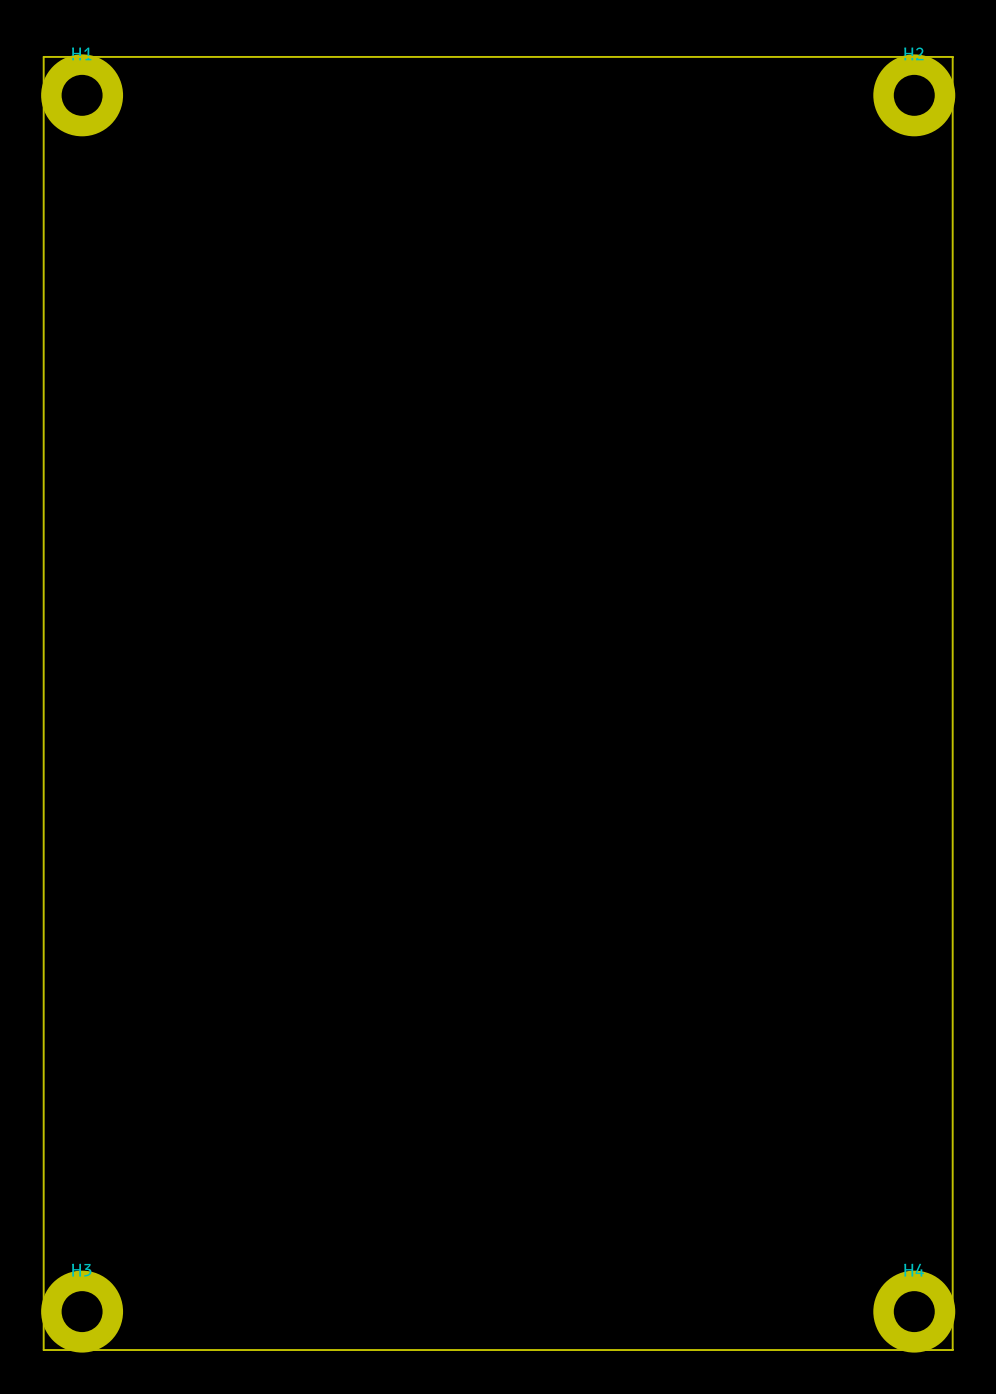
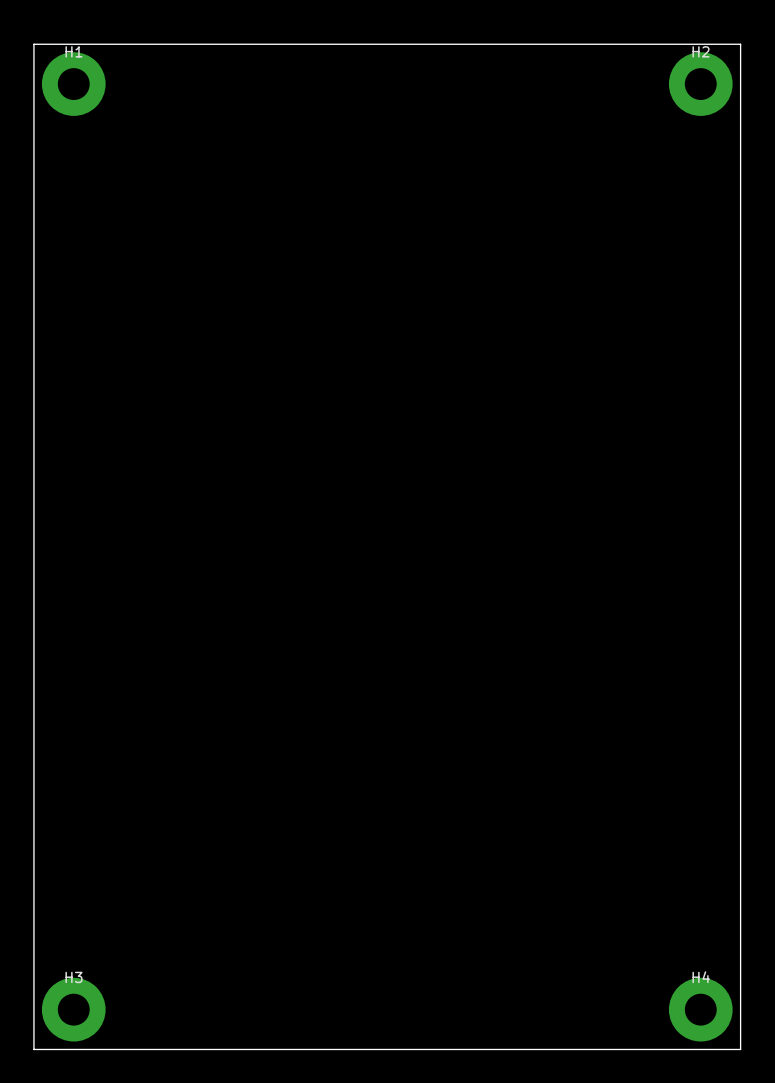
H1 position: (82, 95) -> (73, 84)
H2 position: (914, 95) -> (700, 84)
H3 position: (82, 1311) -> (73, 1009)
H4 position: (914, 1311) -> (700, 1009)

